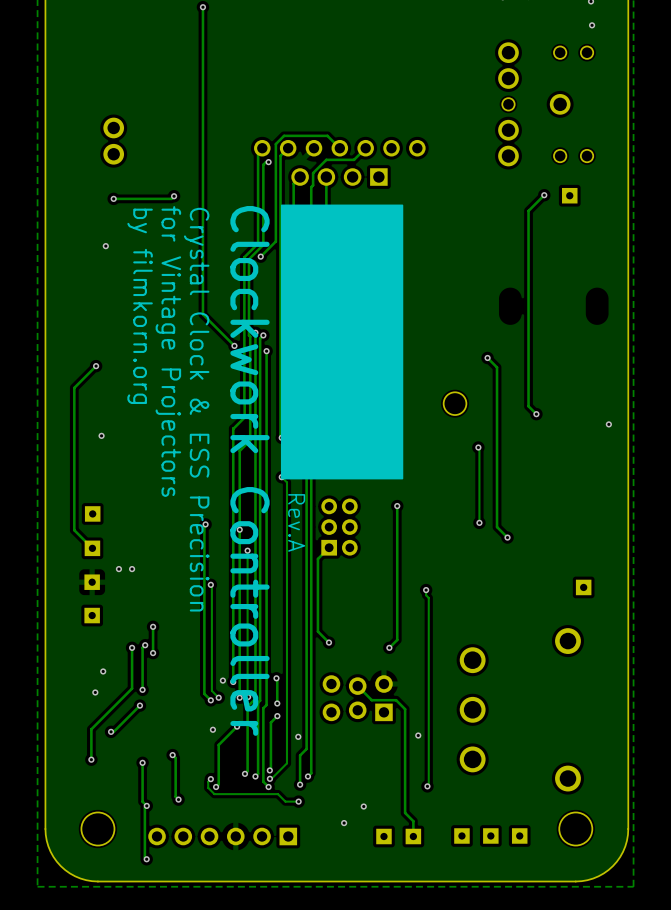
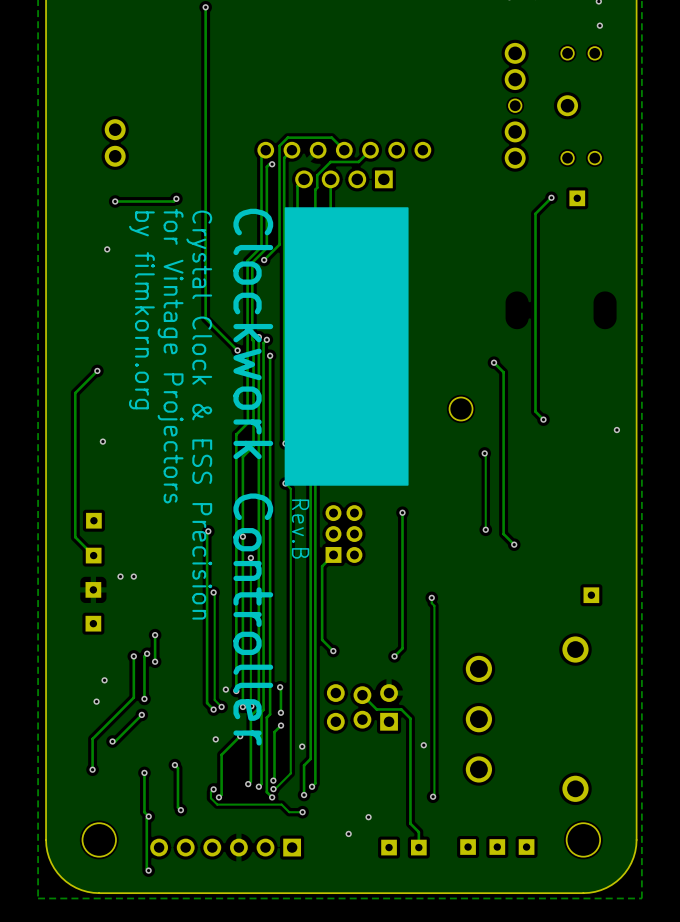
text: Rev.A (296, 522) -> Rev.B (300, 529)

